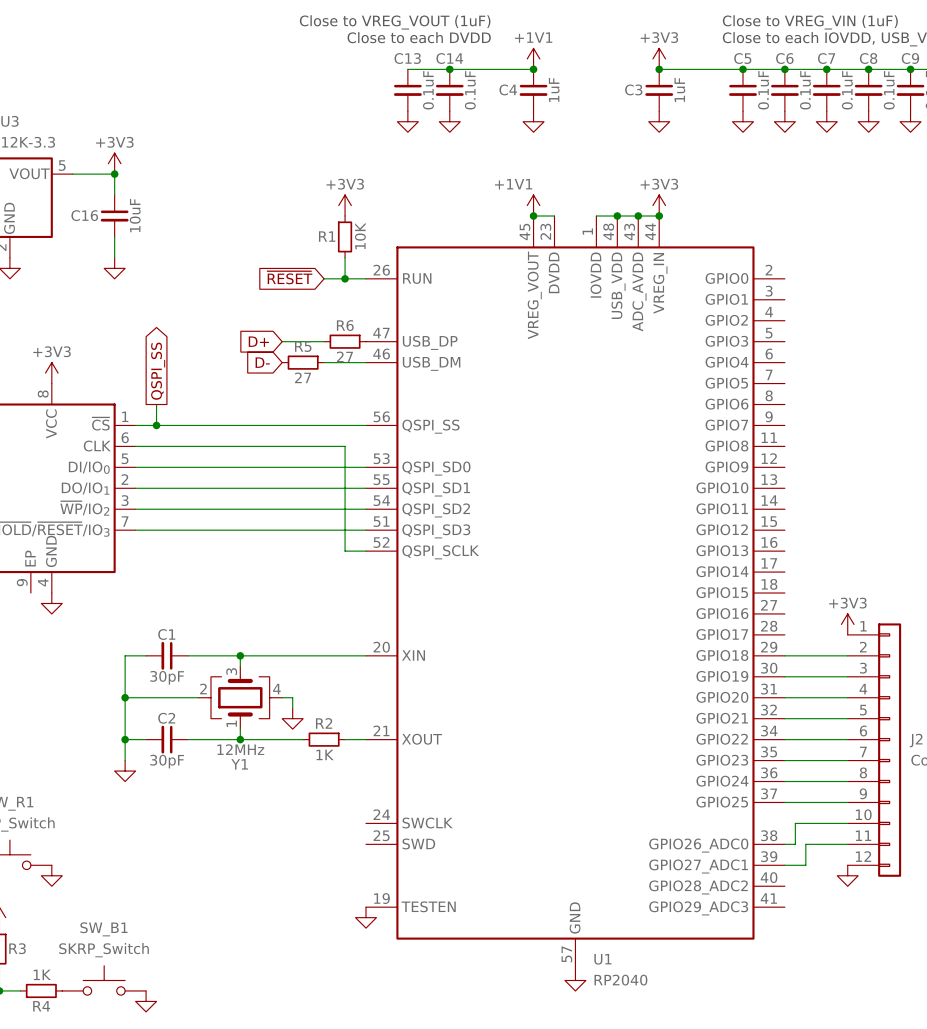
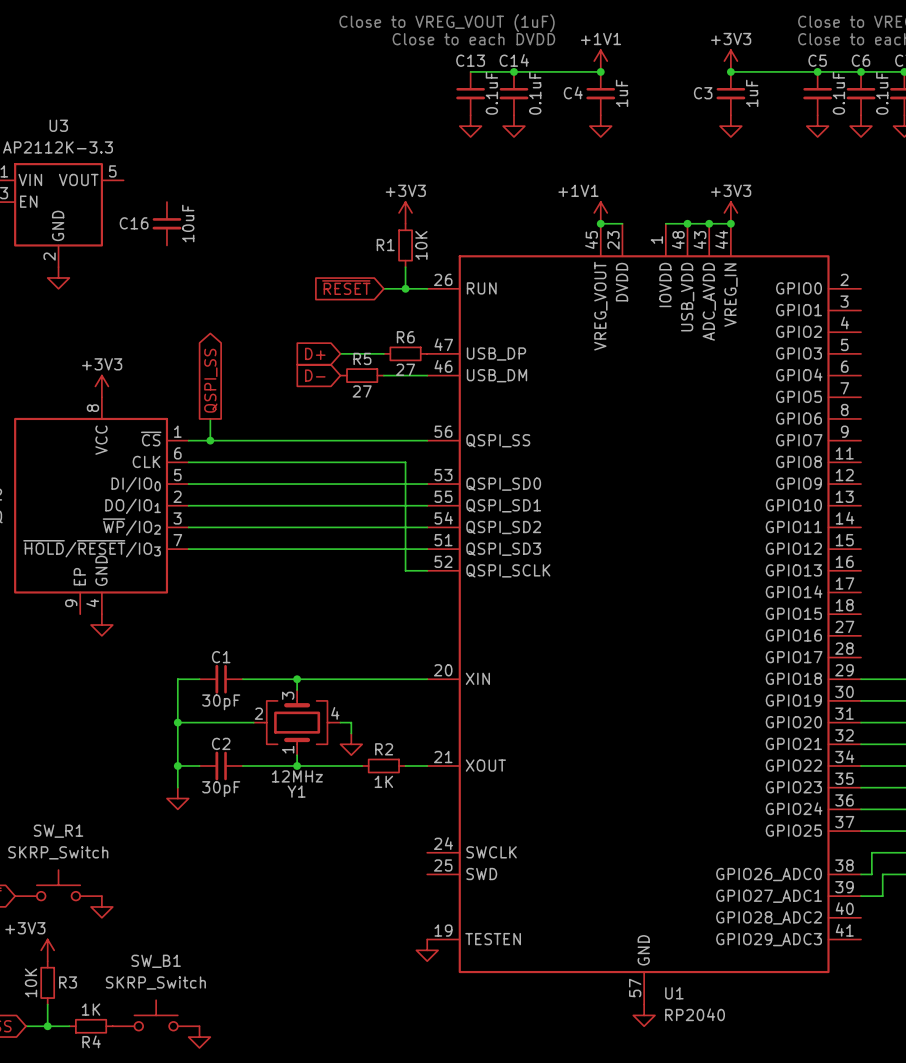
power symbol: +3V3 (114, 163) -> none
wire: (72, 174) (114, 174) (114, 195) -> none
junction: (114, 174) -> none
wire: (114, 236) (114, 257) -> none
power symbol: (114, 268) -> none

